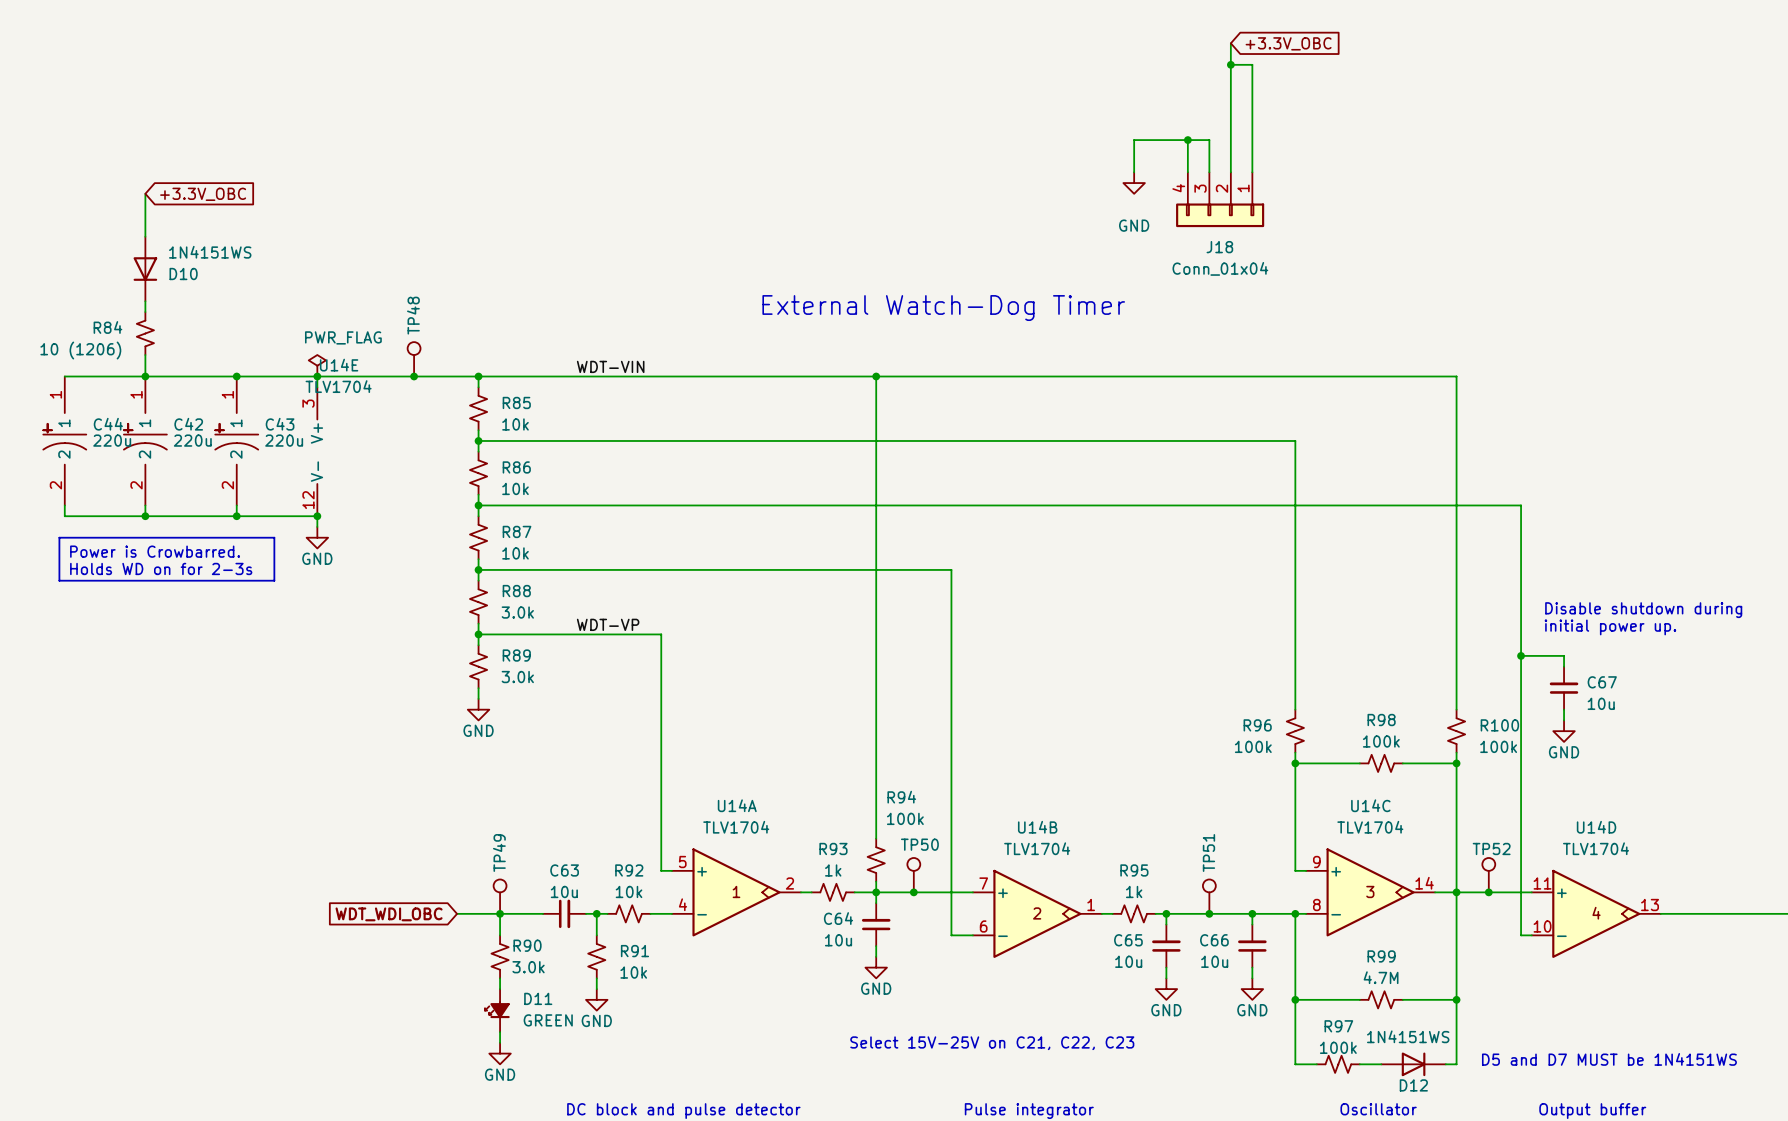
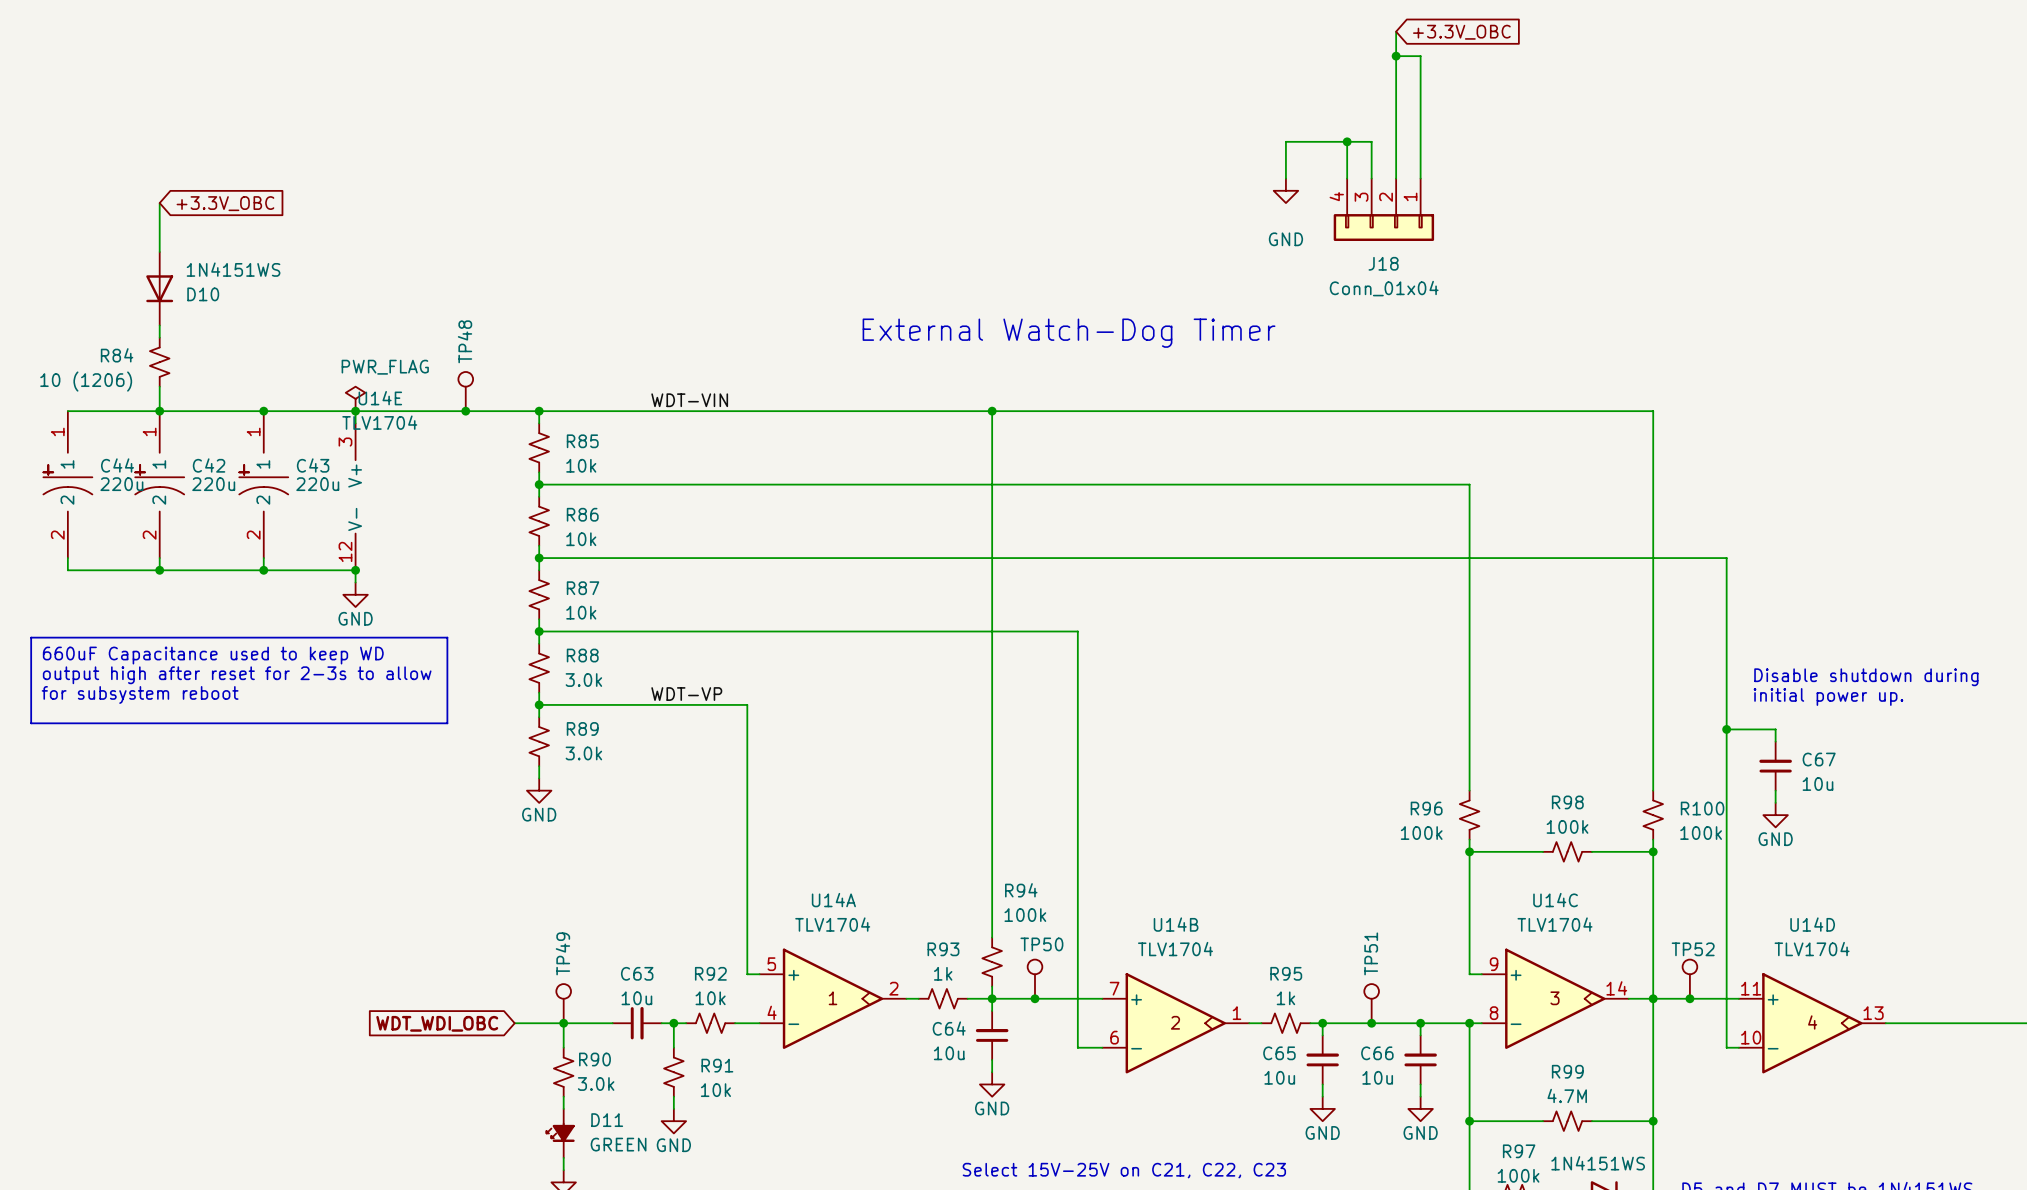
line: (59, 537) (274, 537) (274, 580) (59, 580) (59, 537) -> none
text: Power is Crowbarred. (155, 551) -> none
text: Holds WD on for 2-3s (161, 568) -> none
line: none -> (31, 637) (447, 637) (447, 723) (31, 723) (31, 637)
text: none -> 660uF Capacitance used to keep WD (213, 655)
text: none -> output high after reset for 2-3s to allow (237, 675)
text: none -> for subsystem reboot (140, 694)

